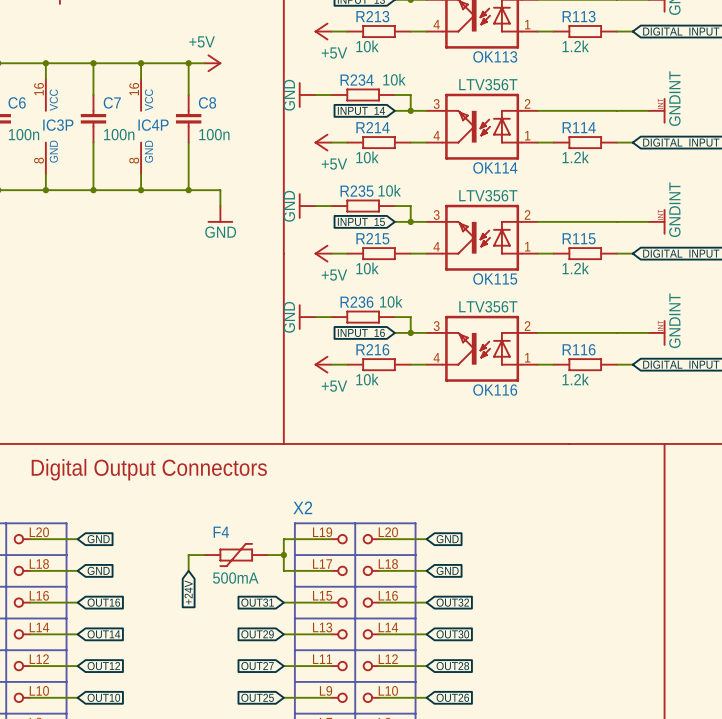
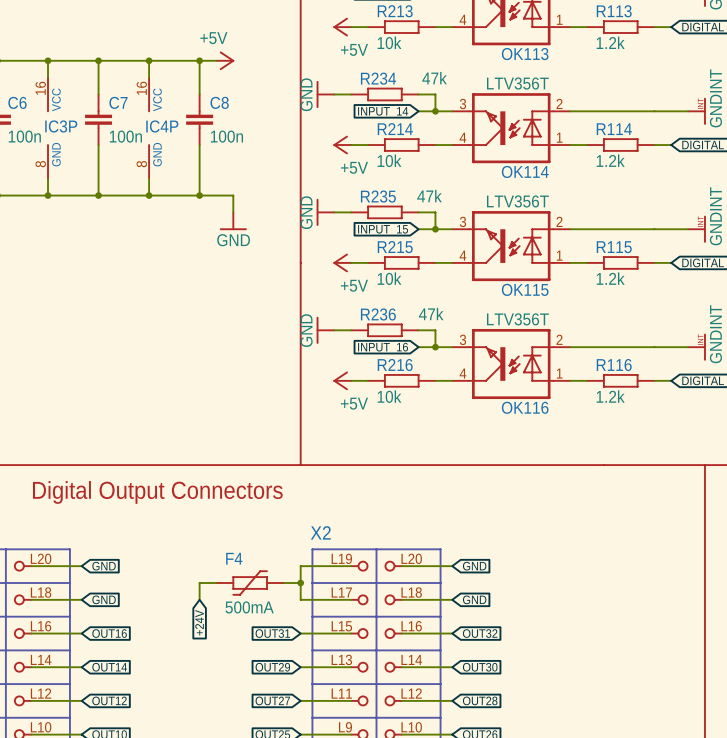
R234 value: 10k (394, 79) -> 47k (434, 78)
R235 value: 10k (389, 190) -> 47k (429, 196)
R236 value: 10k (391, 301) -> 47k (431, 314)

